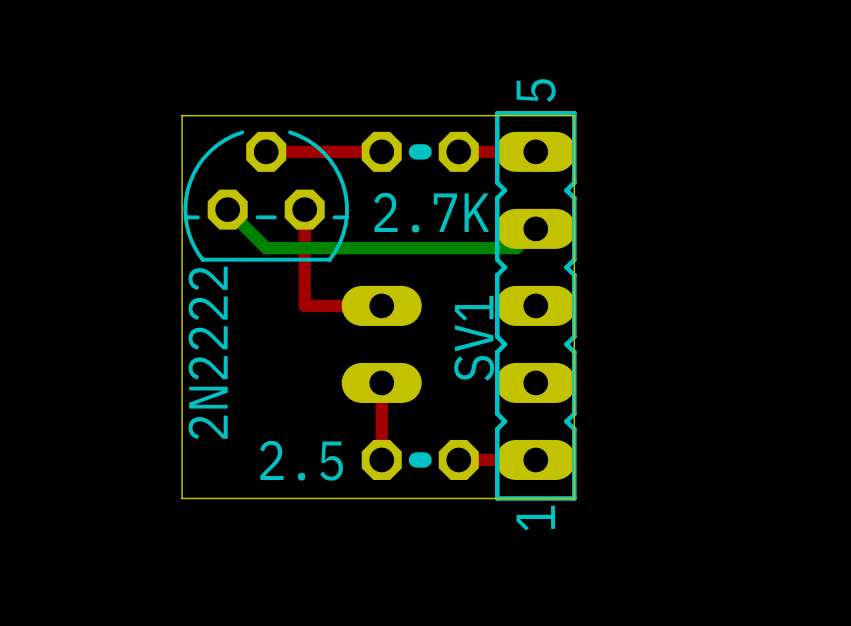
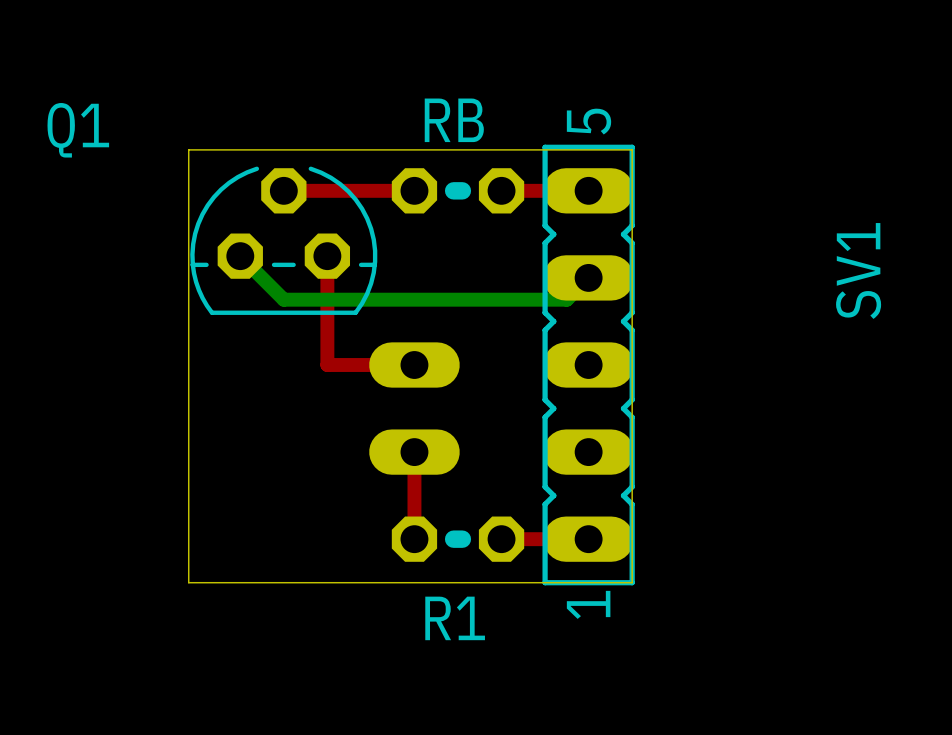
2.7K name: 2.7K (431, 212) -> RB (454, 120)
SV1 name position: SV1 (474, 338) -> SV1 (858, 270)
2N2222 name: 2N2222 (208, 352) -> Q1 (78, 130)
2.5 name: 2.5 (301, 460) -> R1 (455, 618)

